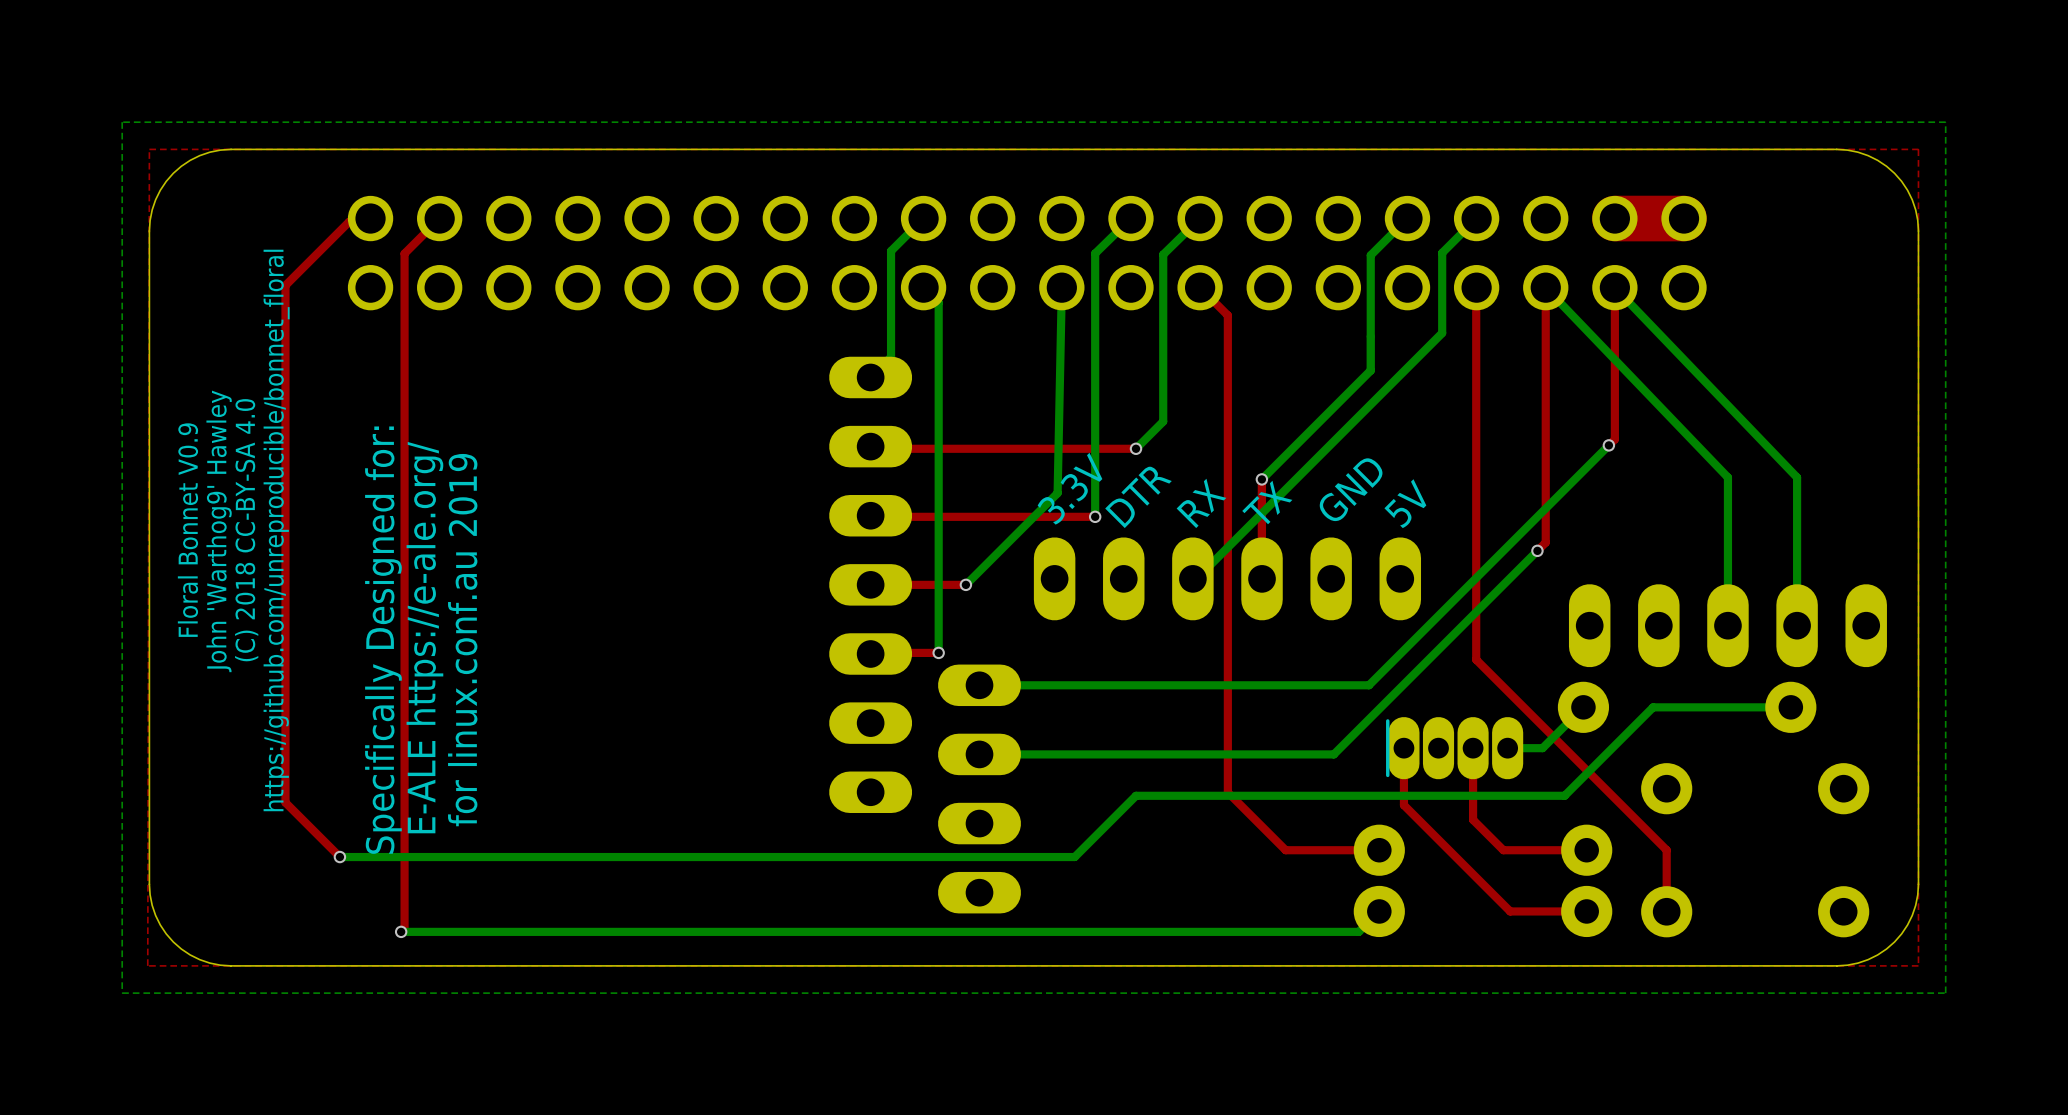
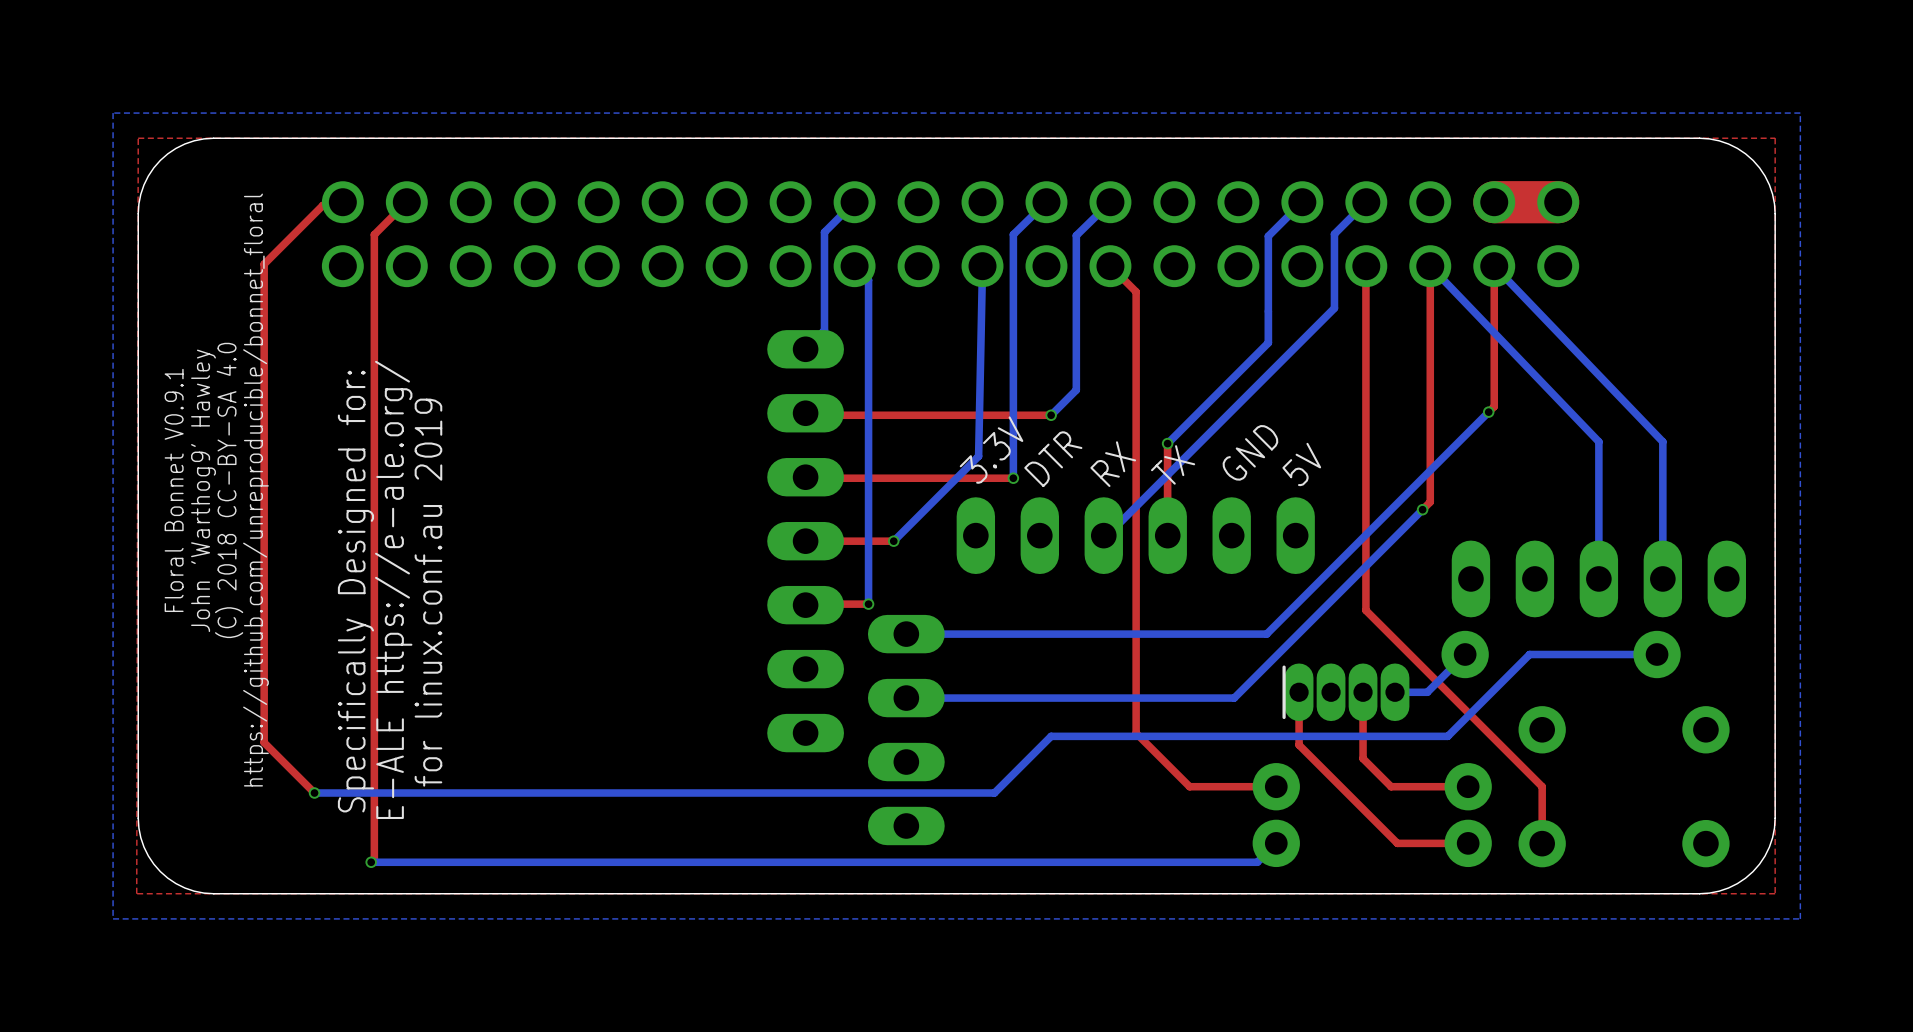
text: Floral Bonnet V0.9 (187, 530) -> Floral Bonnet V0.9.1 (174, 490)

